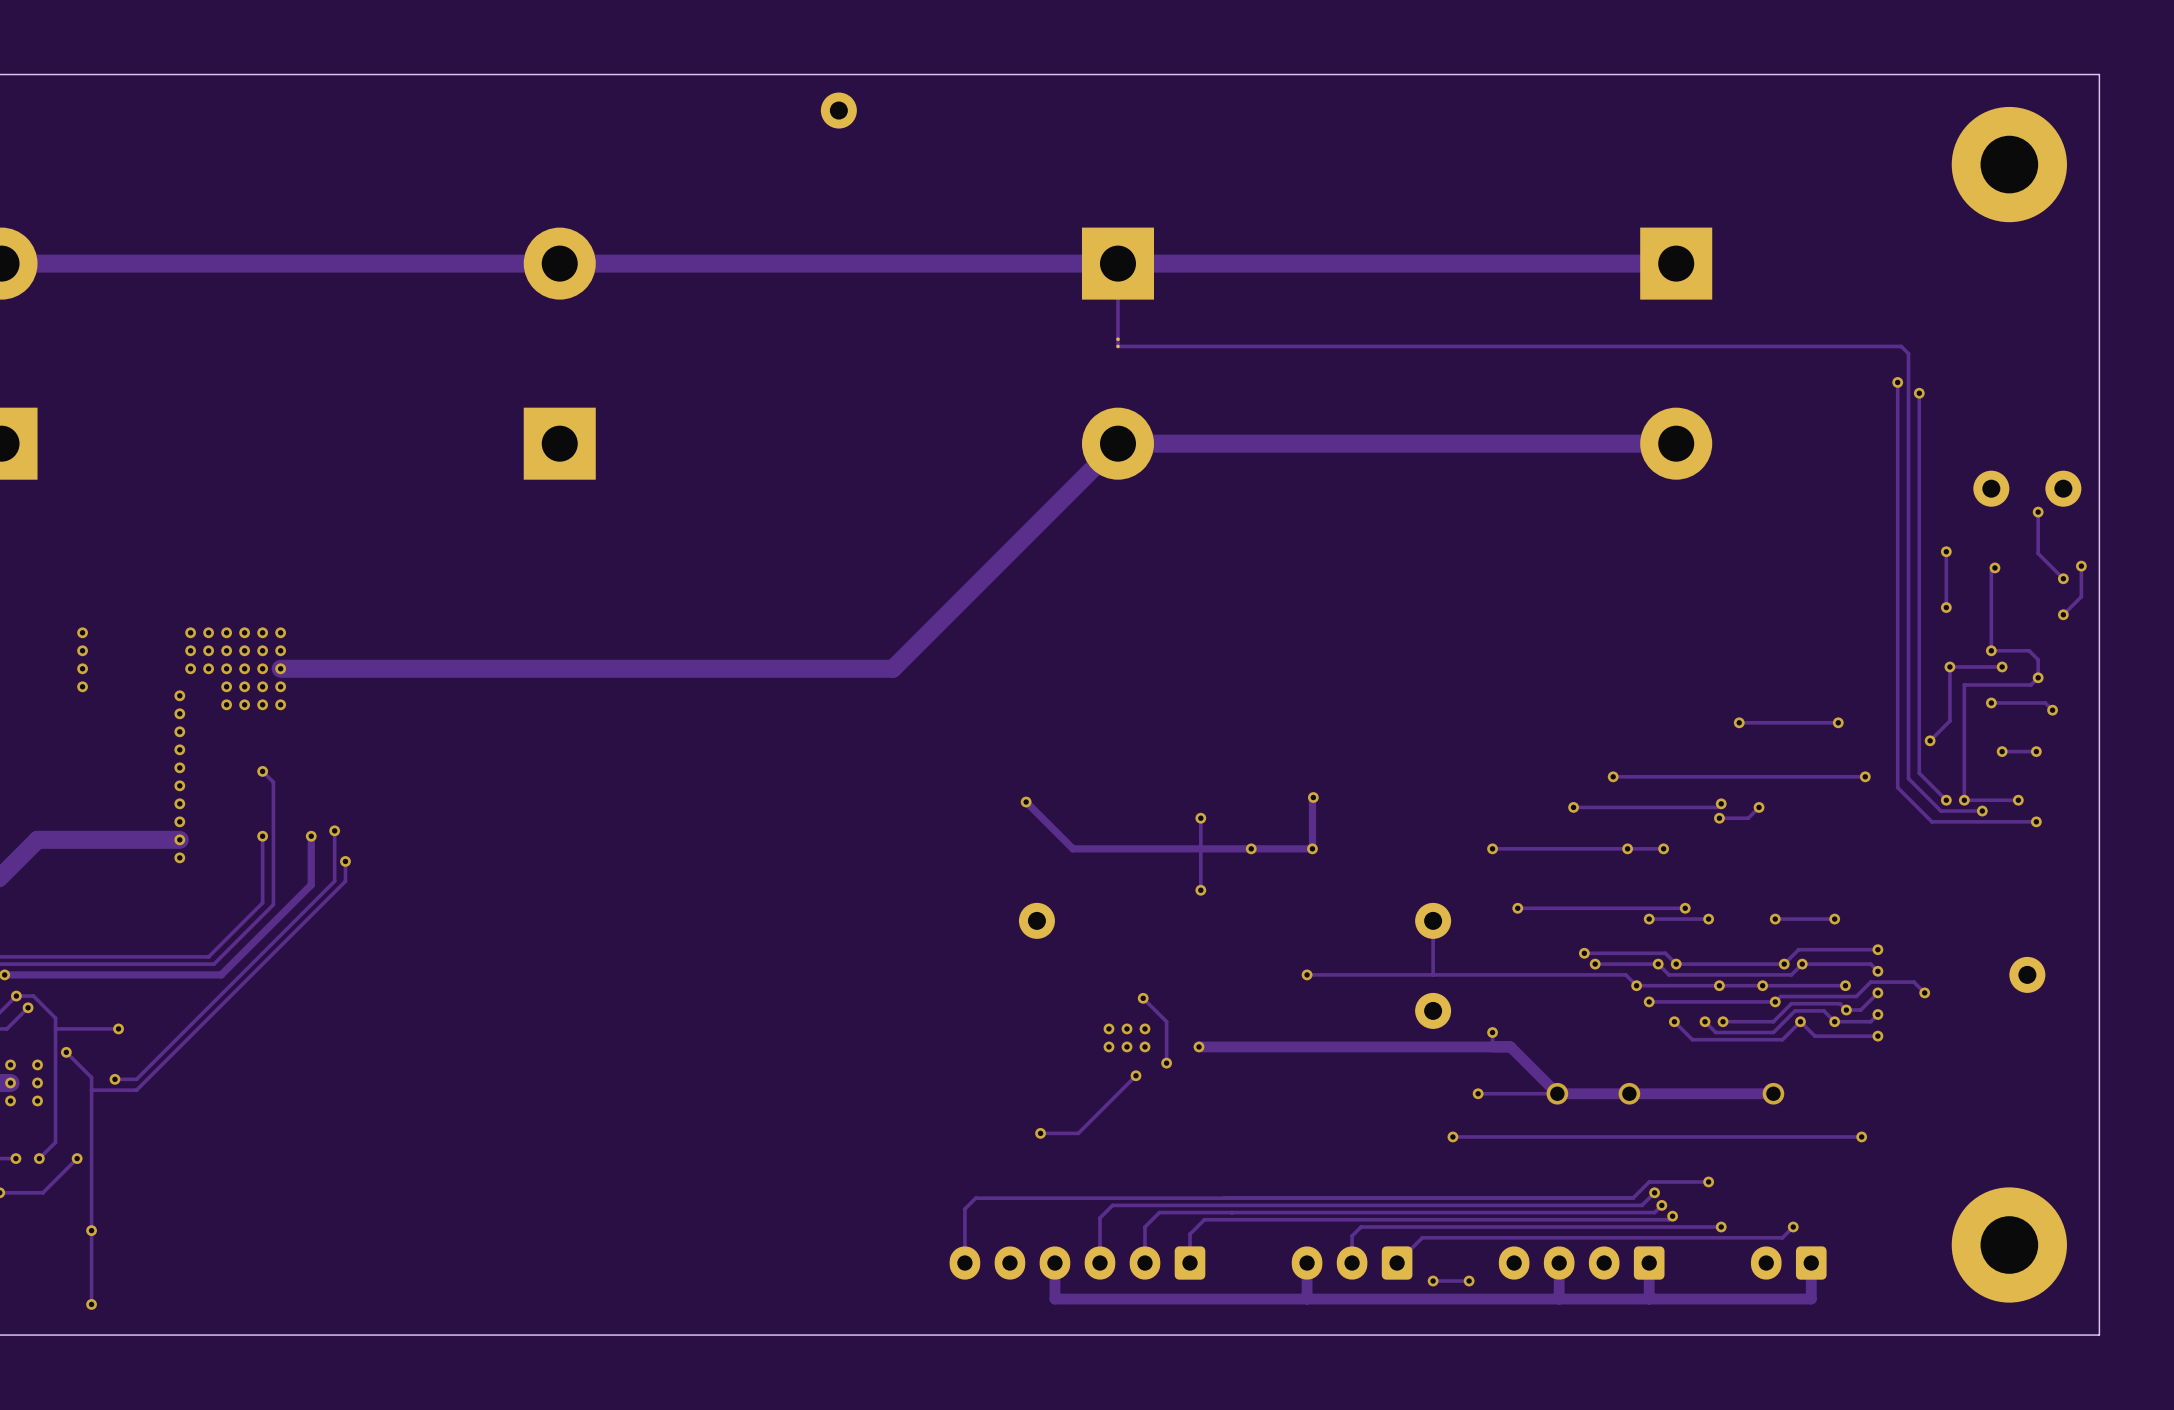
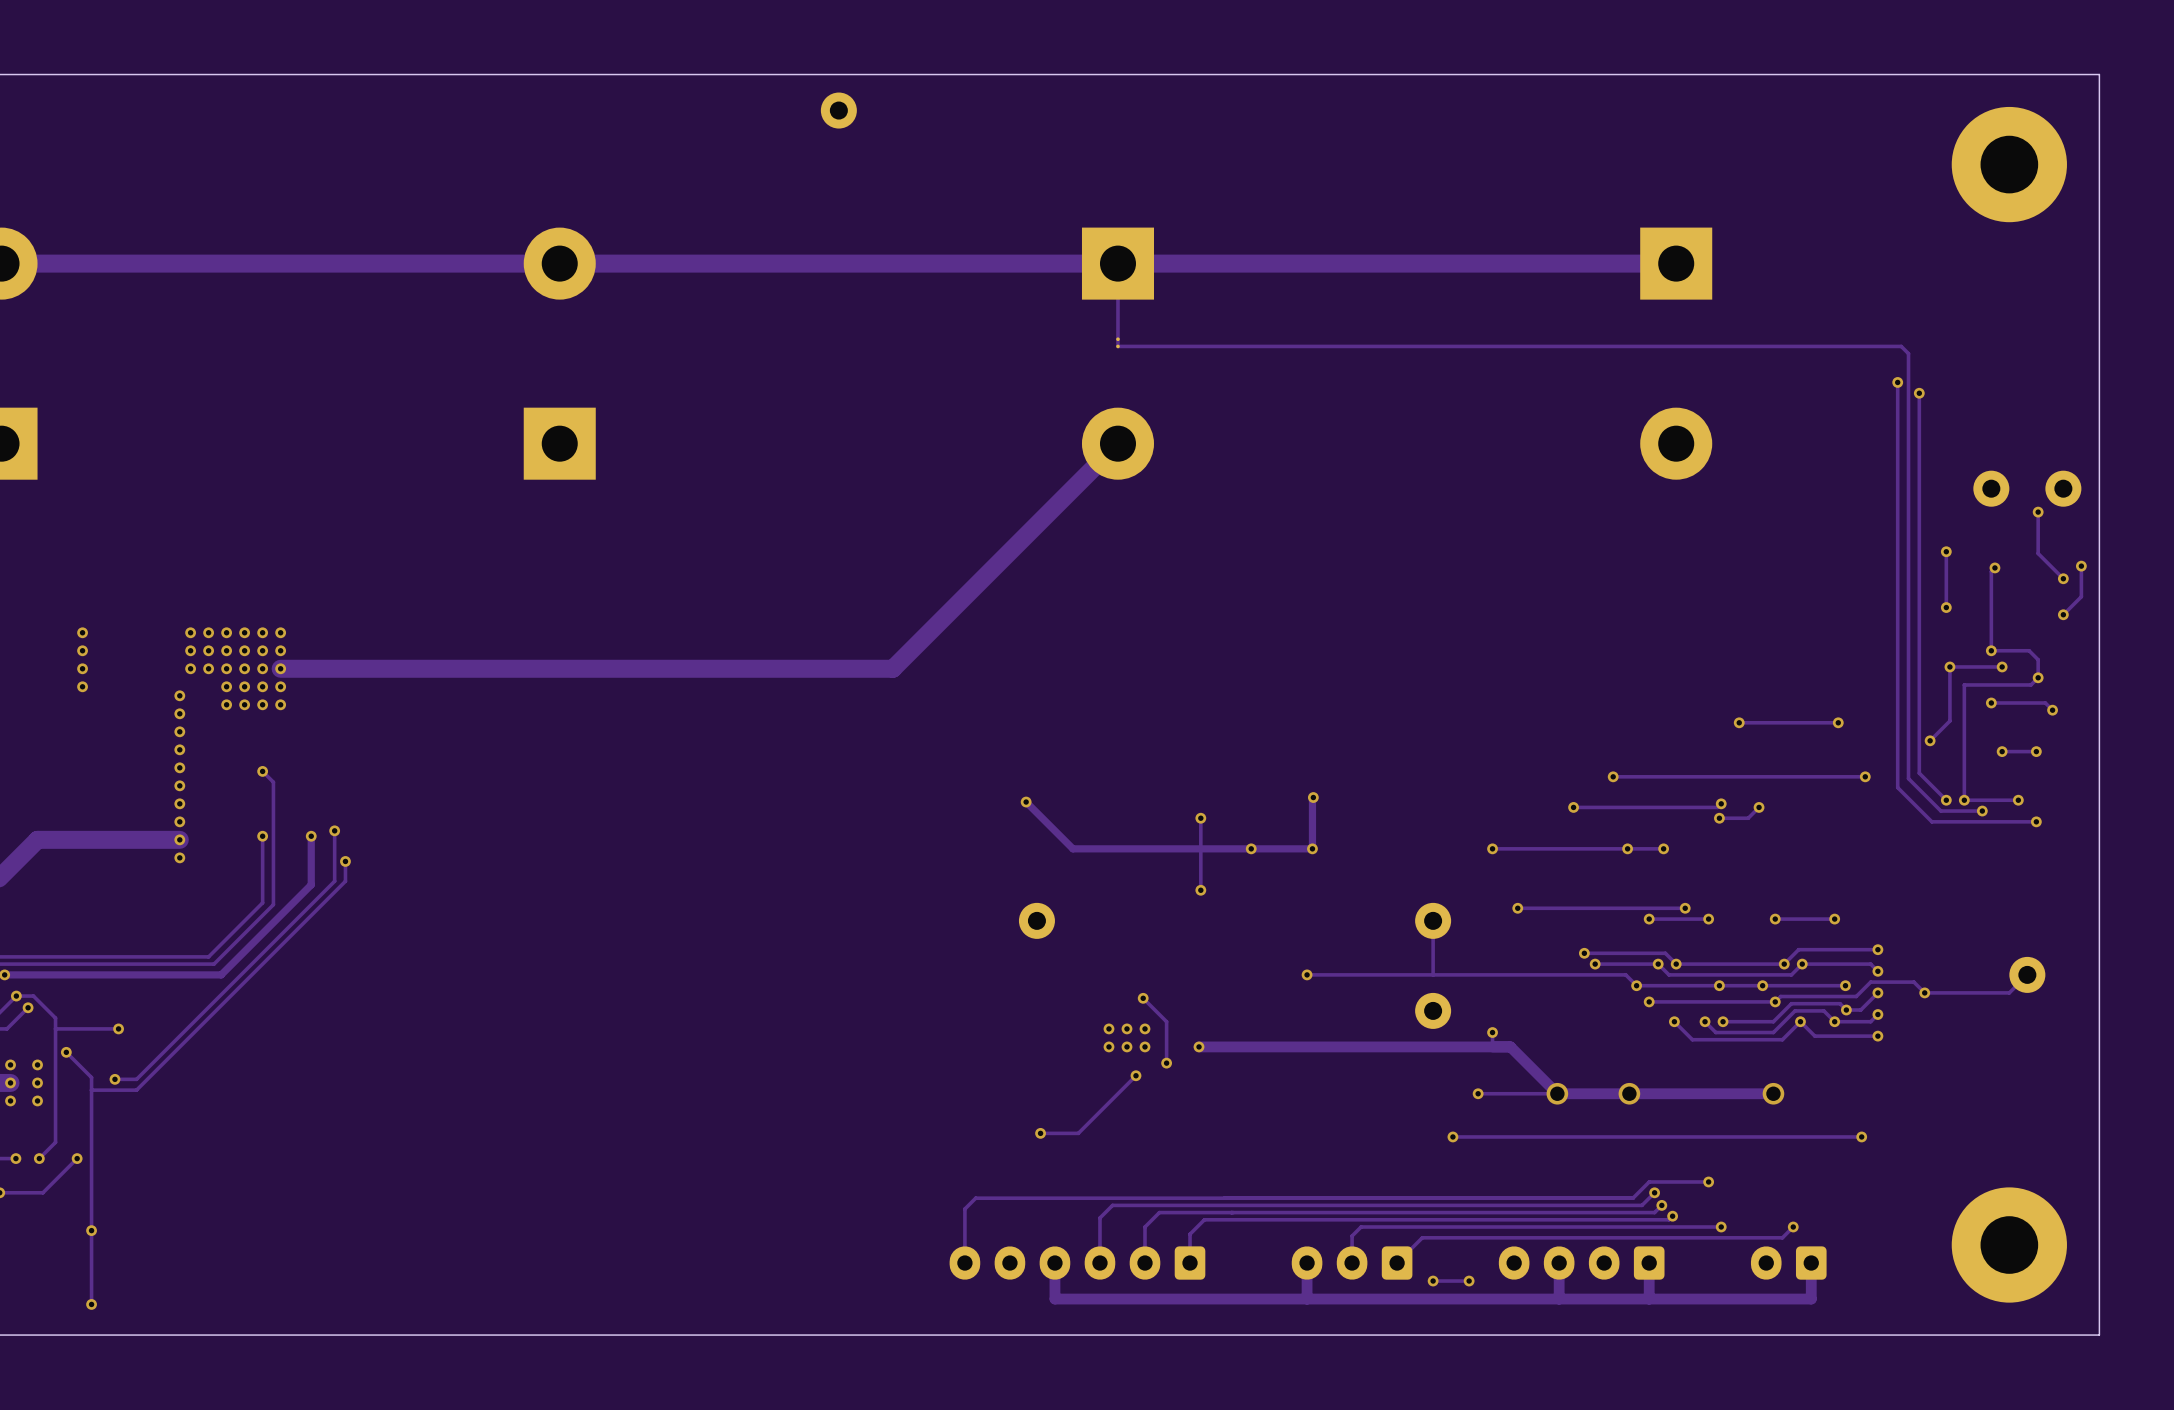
track: (1676, 443) (1117, 443) -> none
track: none -> (2027, 974) (2009, 992) (1924, 992)

